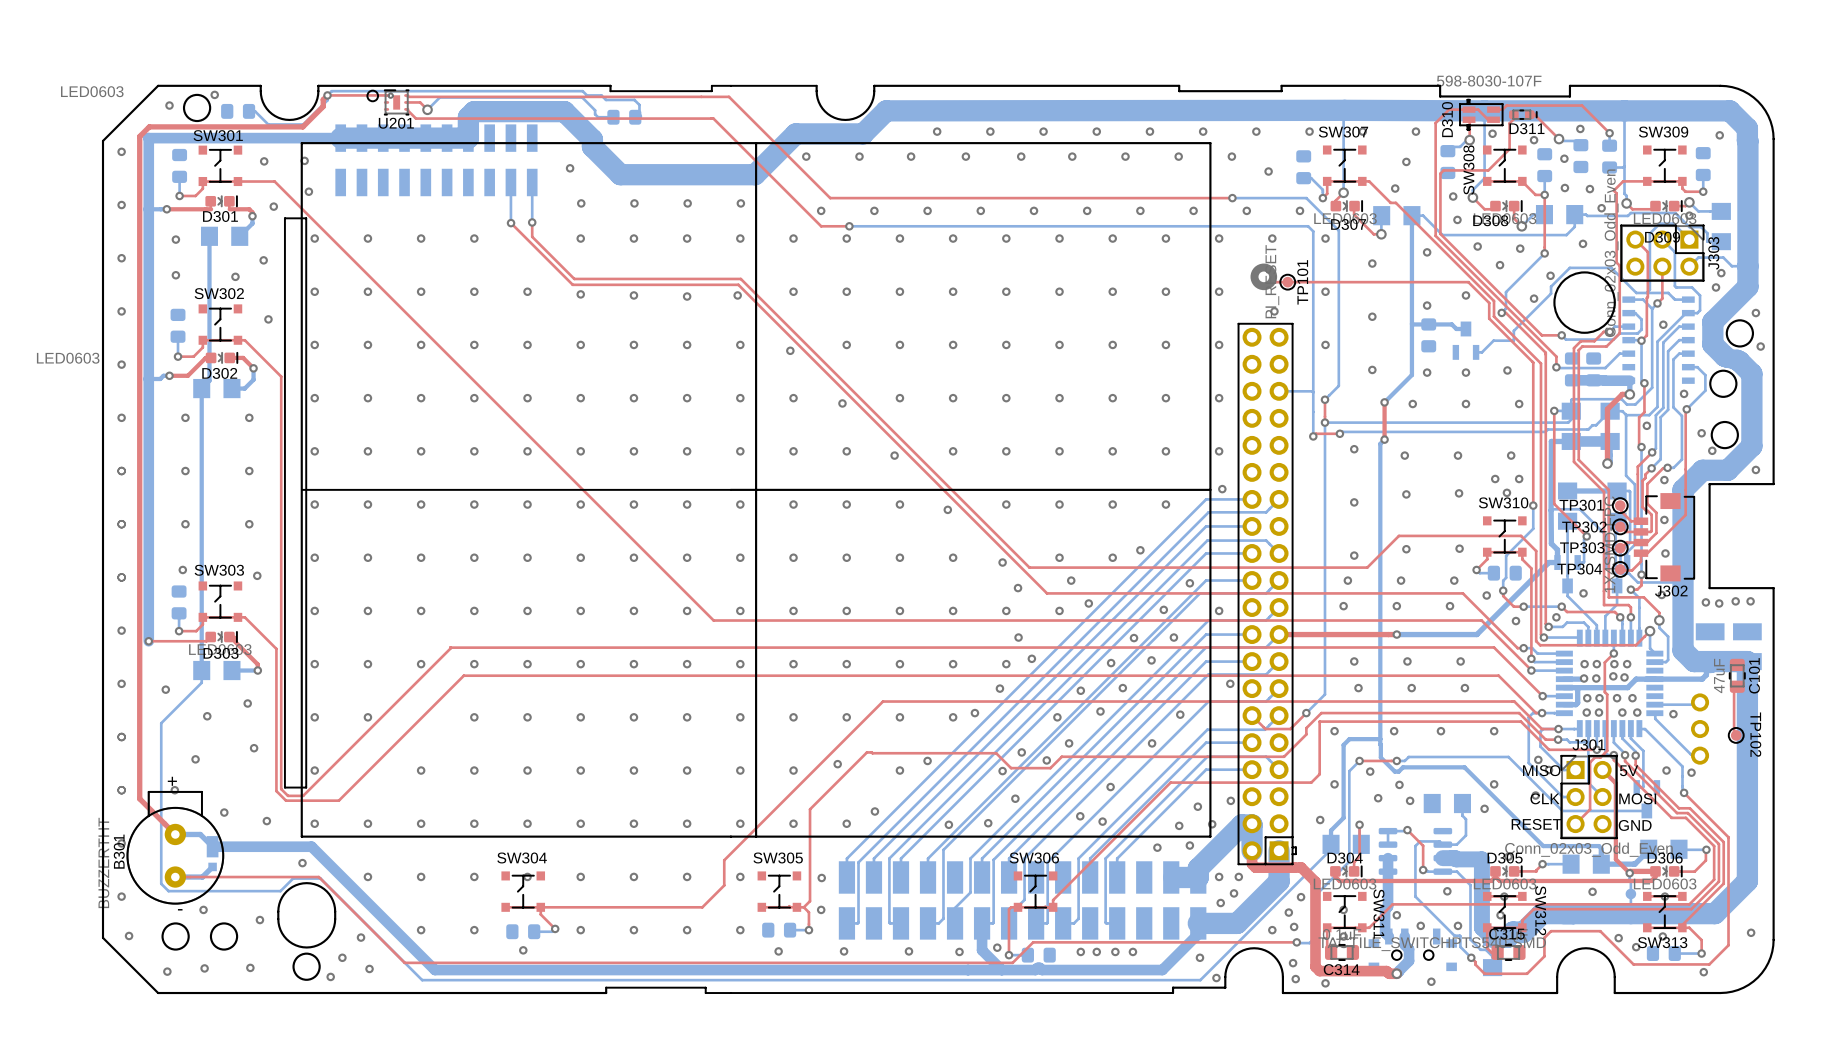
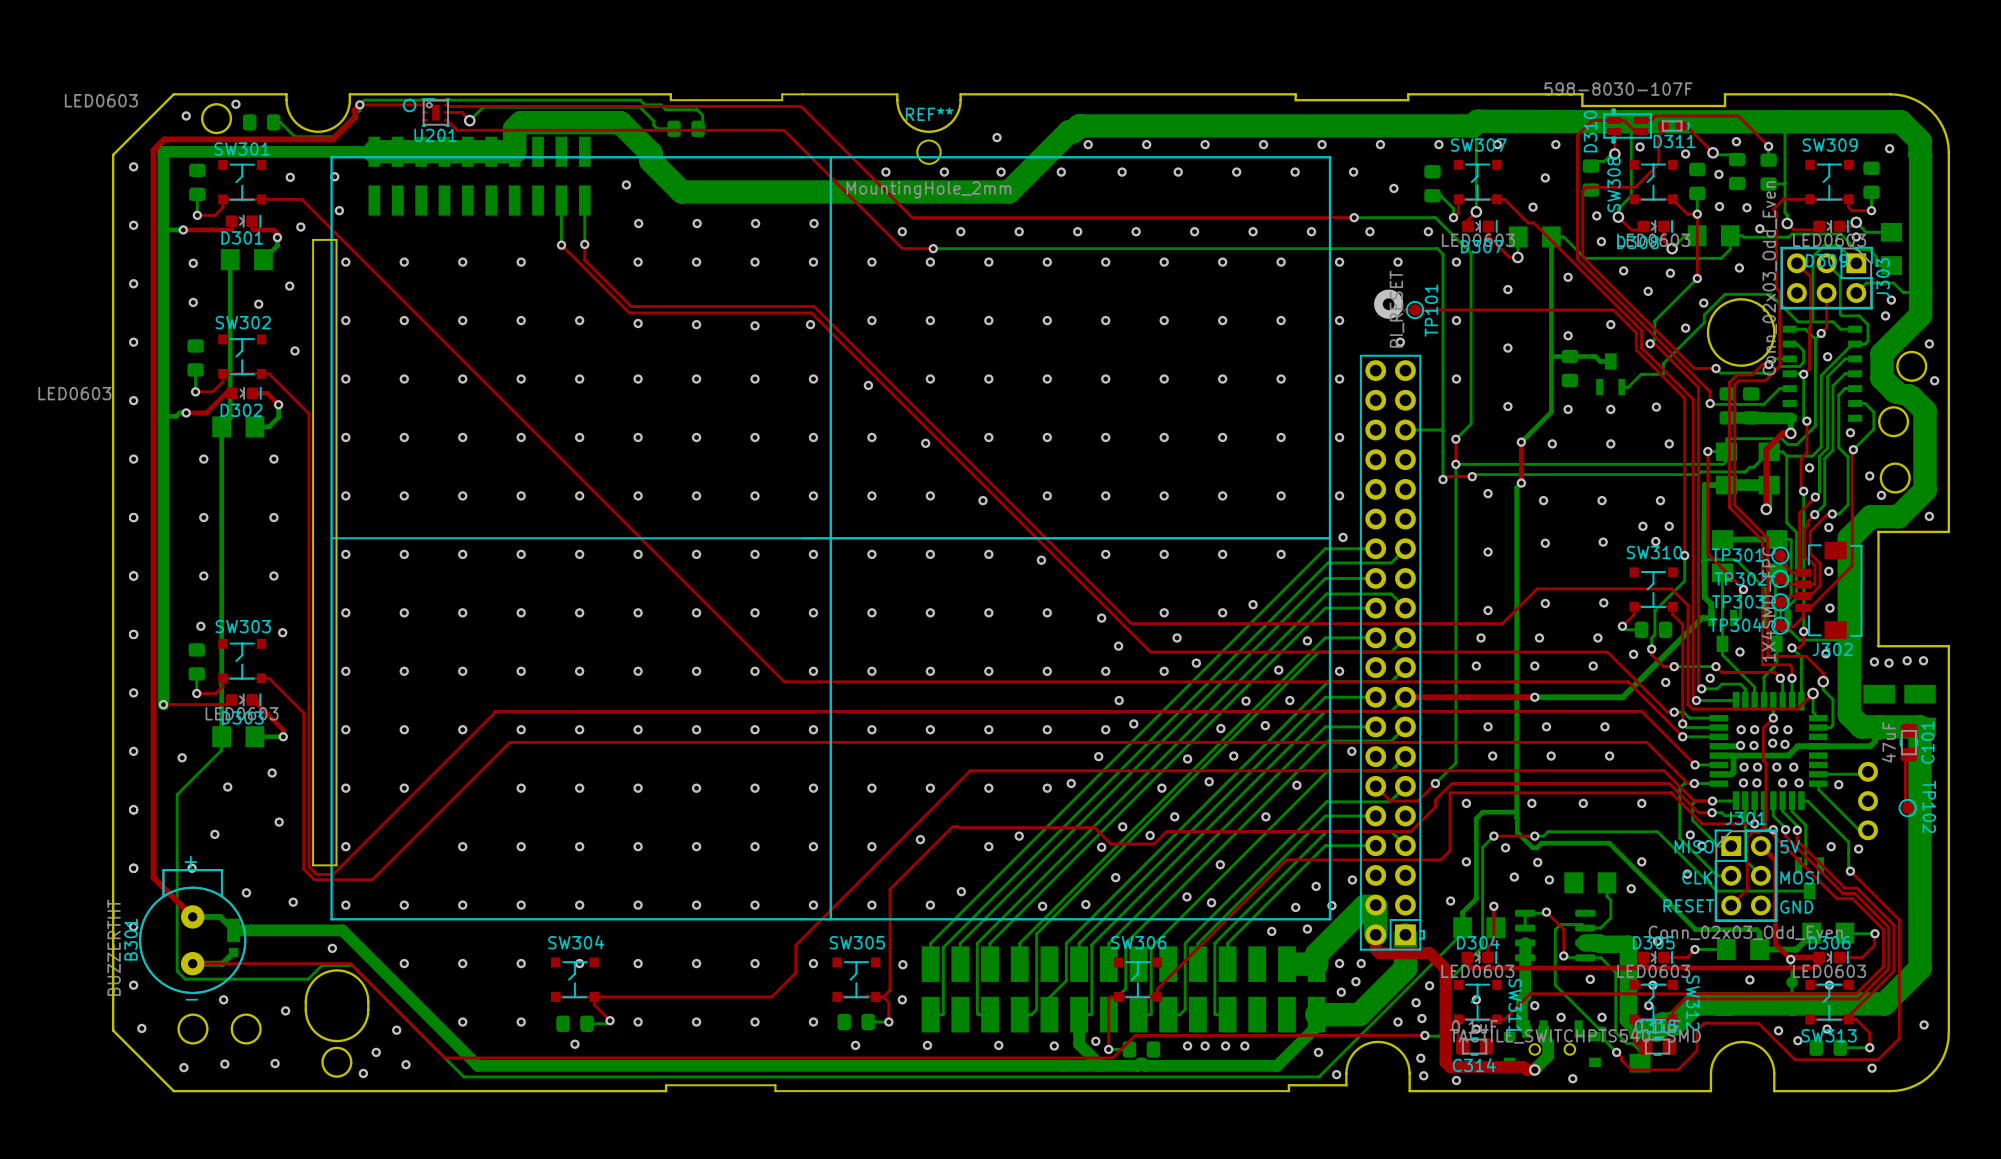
bottom track: (1344, 110) (886, 110) (863, 133) (795, 133) (755, 174) -> (1477, 121) (1472, 125) (1079, 125) (1073, 131) (1069, 131) (1008, 191) (829, 191)
via position: (937, 131) -> (997, 137)
REF**: none -> MountingHole_2mm (928, 152)

